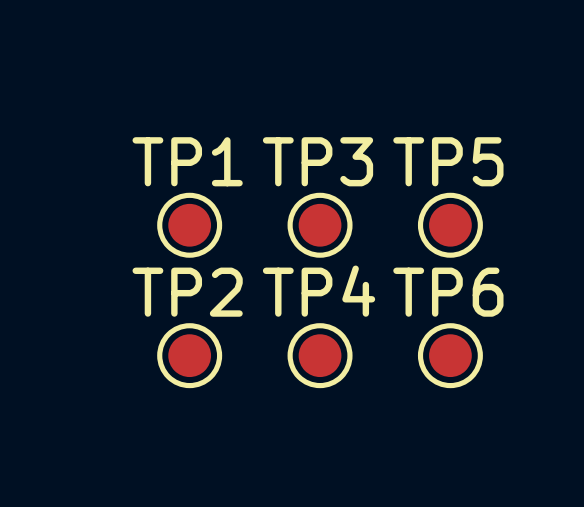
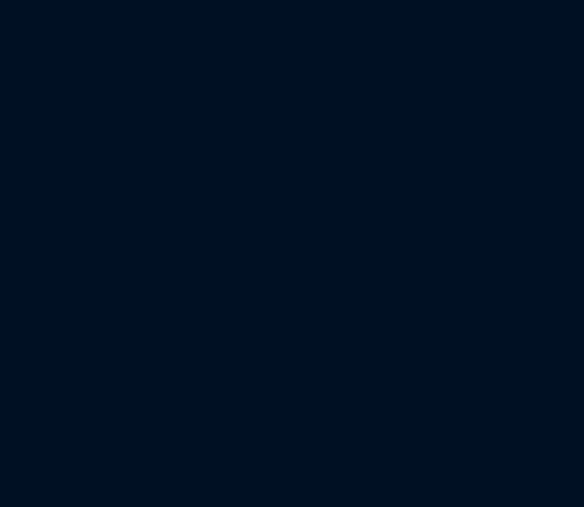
TP1: (189, 225) -> none
TP3: (320, 225) -> none
TP5: (450, 225) -> none
TP2: (189, 355) -> none
TP4: (320, 355) -> none
TP6: (450, 355) -> none

